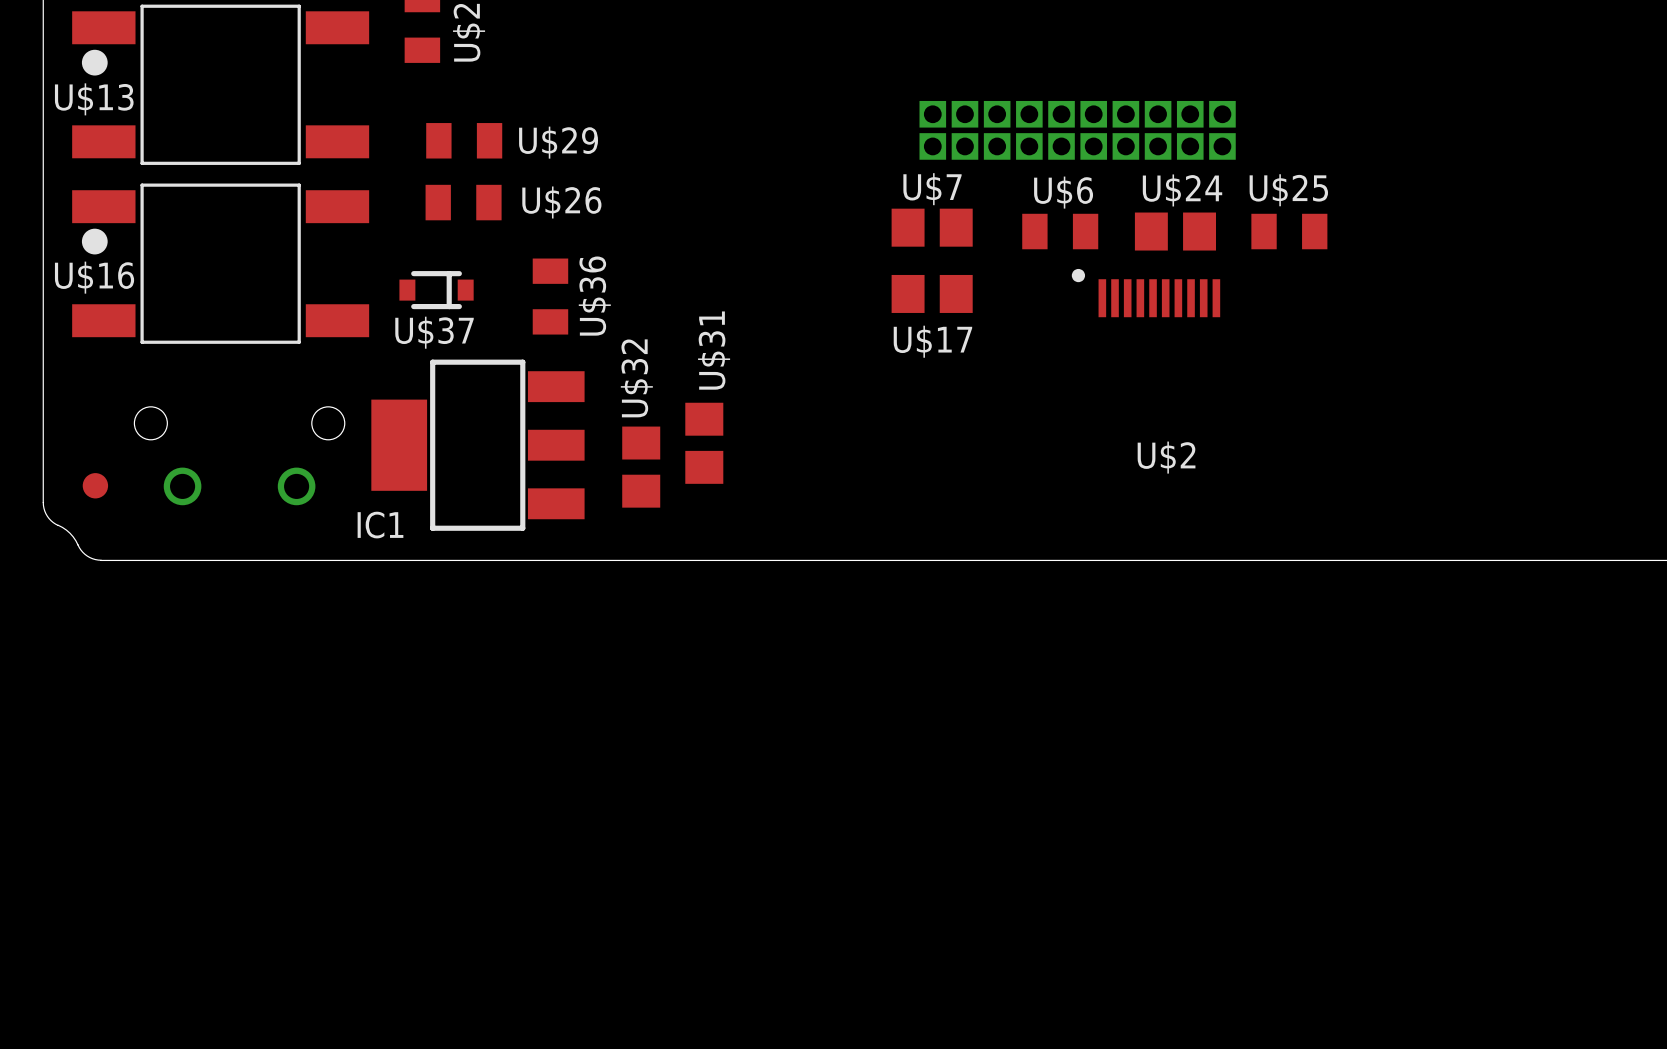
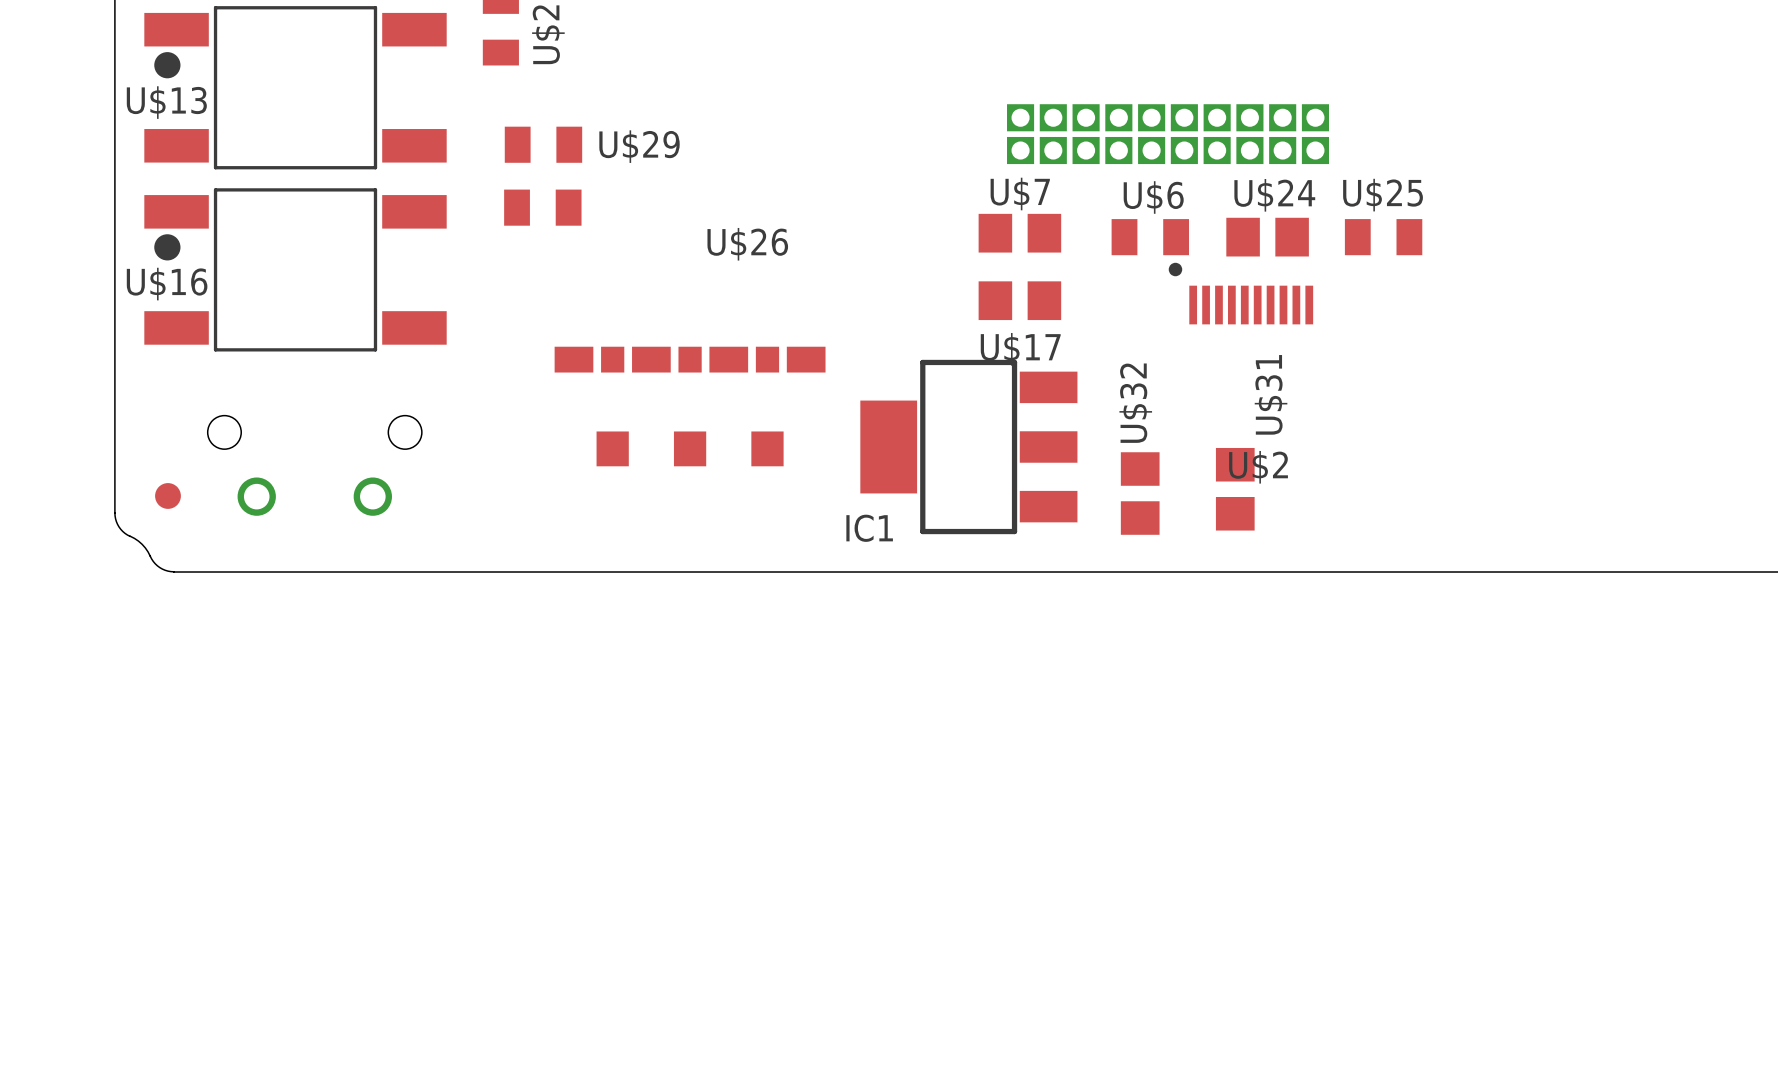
U$26 name position: U$26 (561, 202) -> U$26 (747, 244)
U$2 footprint: [1071, 268, 1221, 318] -> [1168, 262, 1314, 325]
U$37: (436, 290) -> none
U$36: (550, 296) -> none
U$31 name position: U$31 (714, 350) -> U$31 (1271, 394)
part: none -> (690, 406)
U$31 position: (704, 443) -> (1235, 489)
IC1 position: (477, 445) -> (968, 447)
U$32 position: (641, 467) -> (1140, 493)

